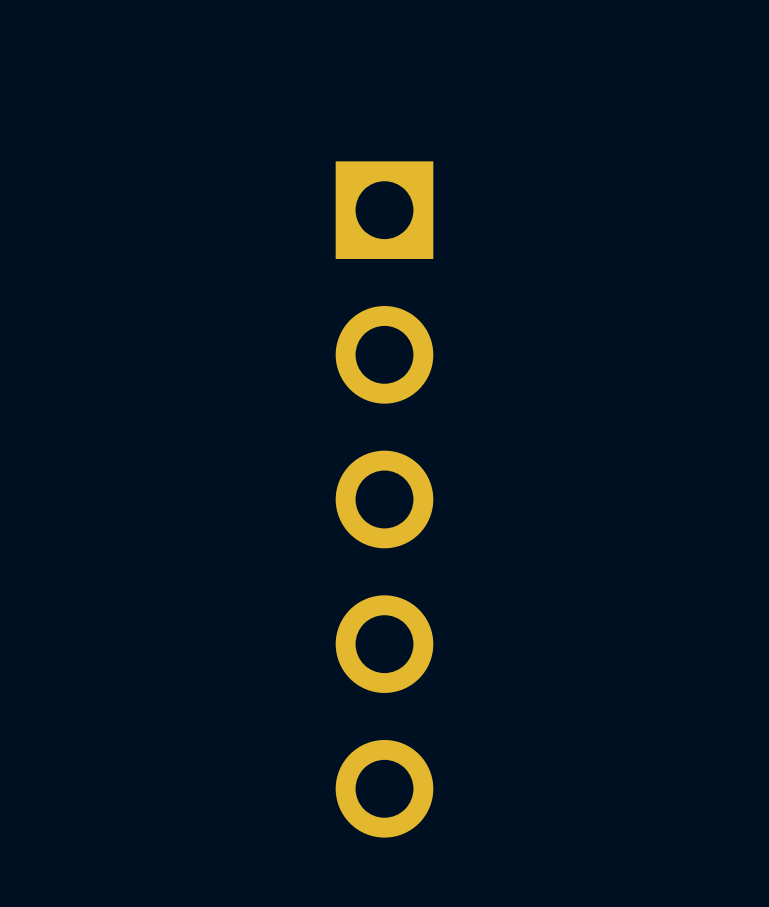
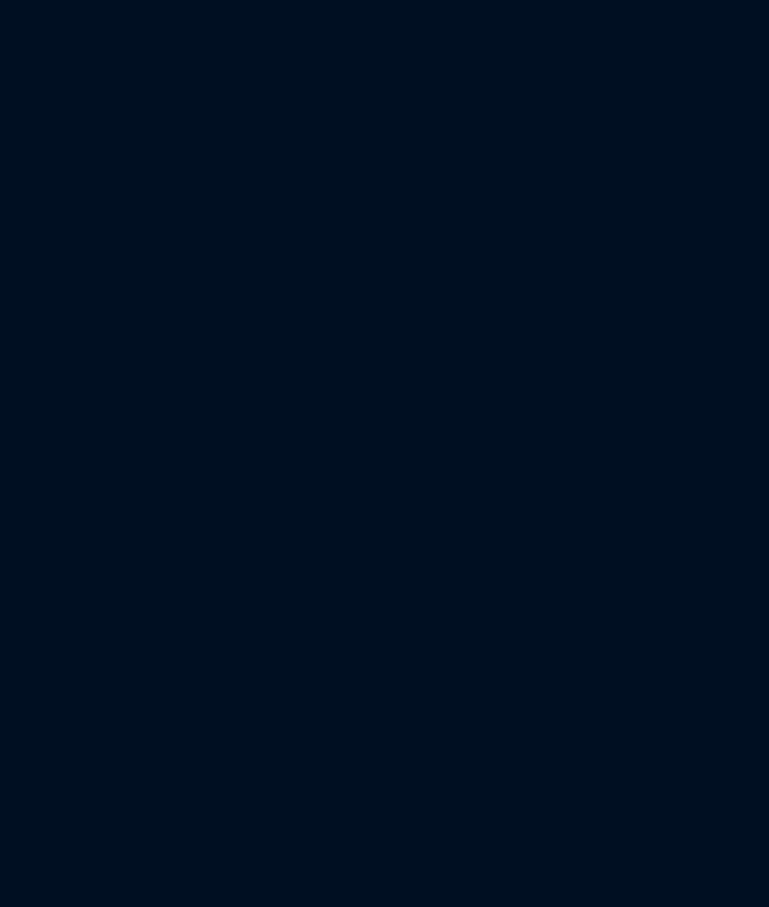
part: (384, 499) -> none

